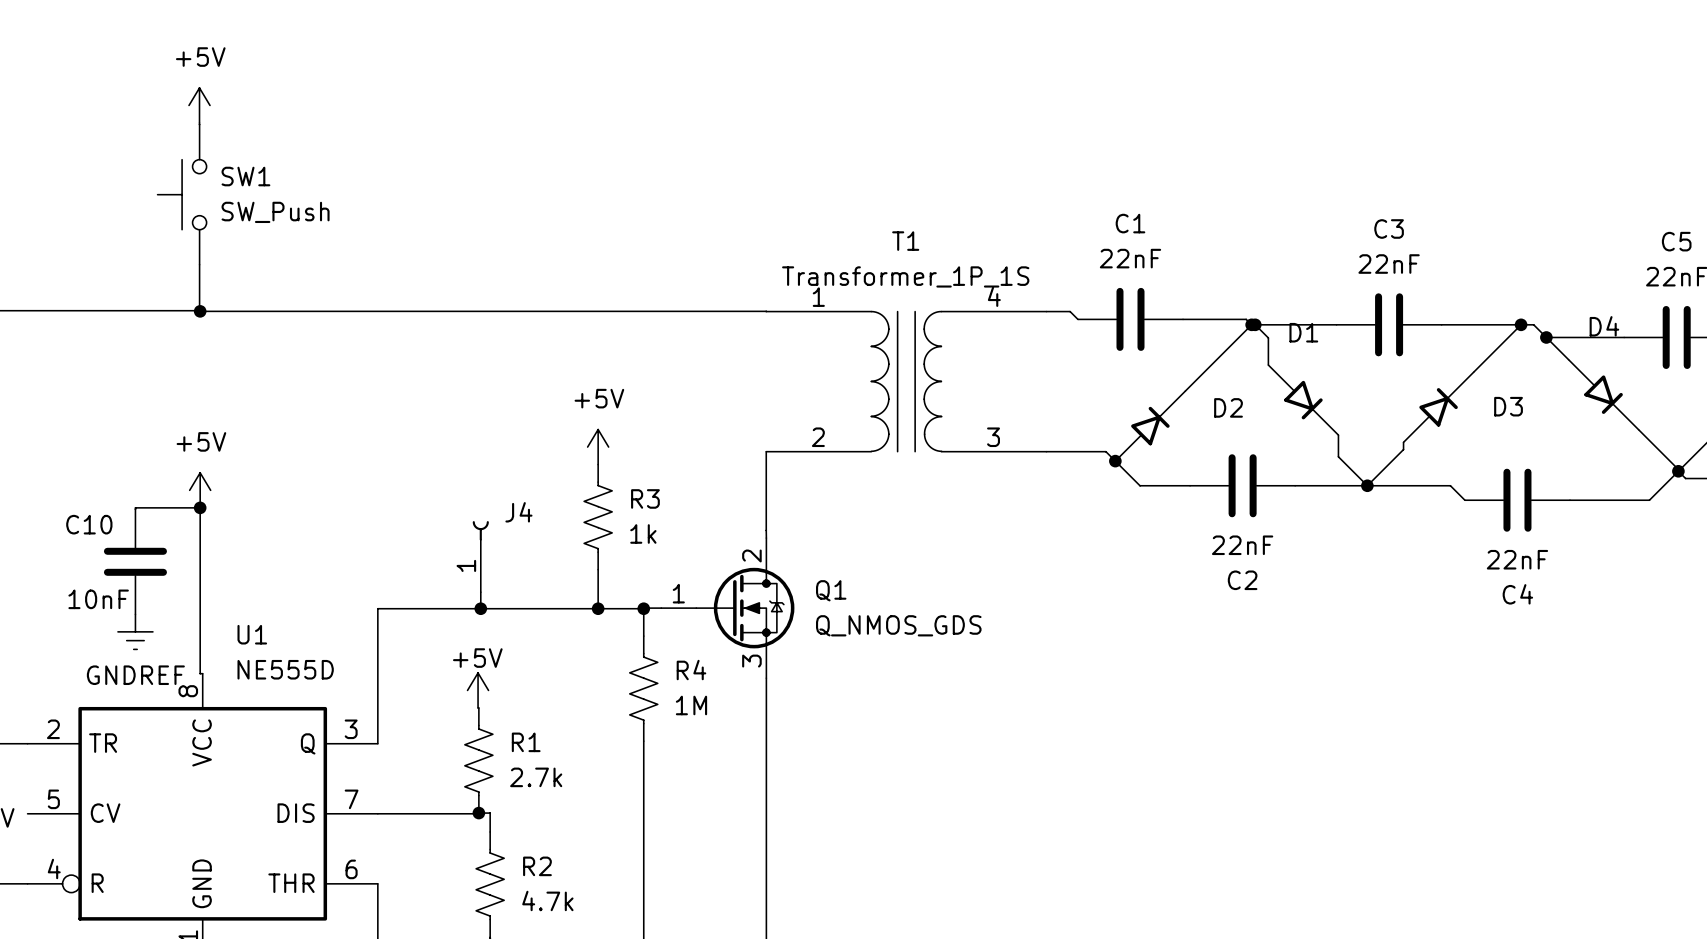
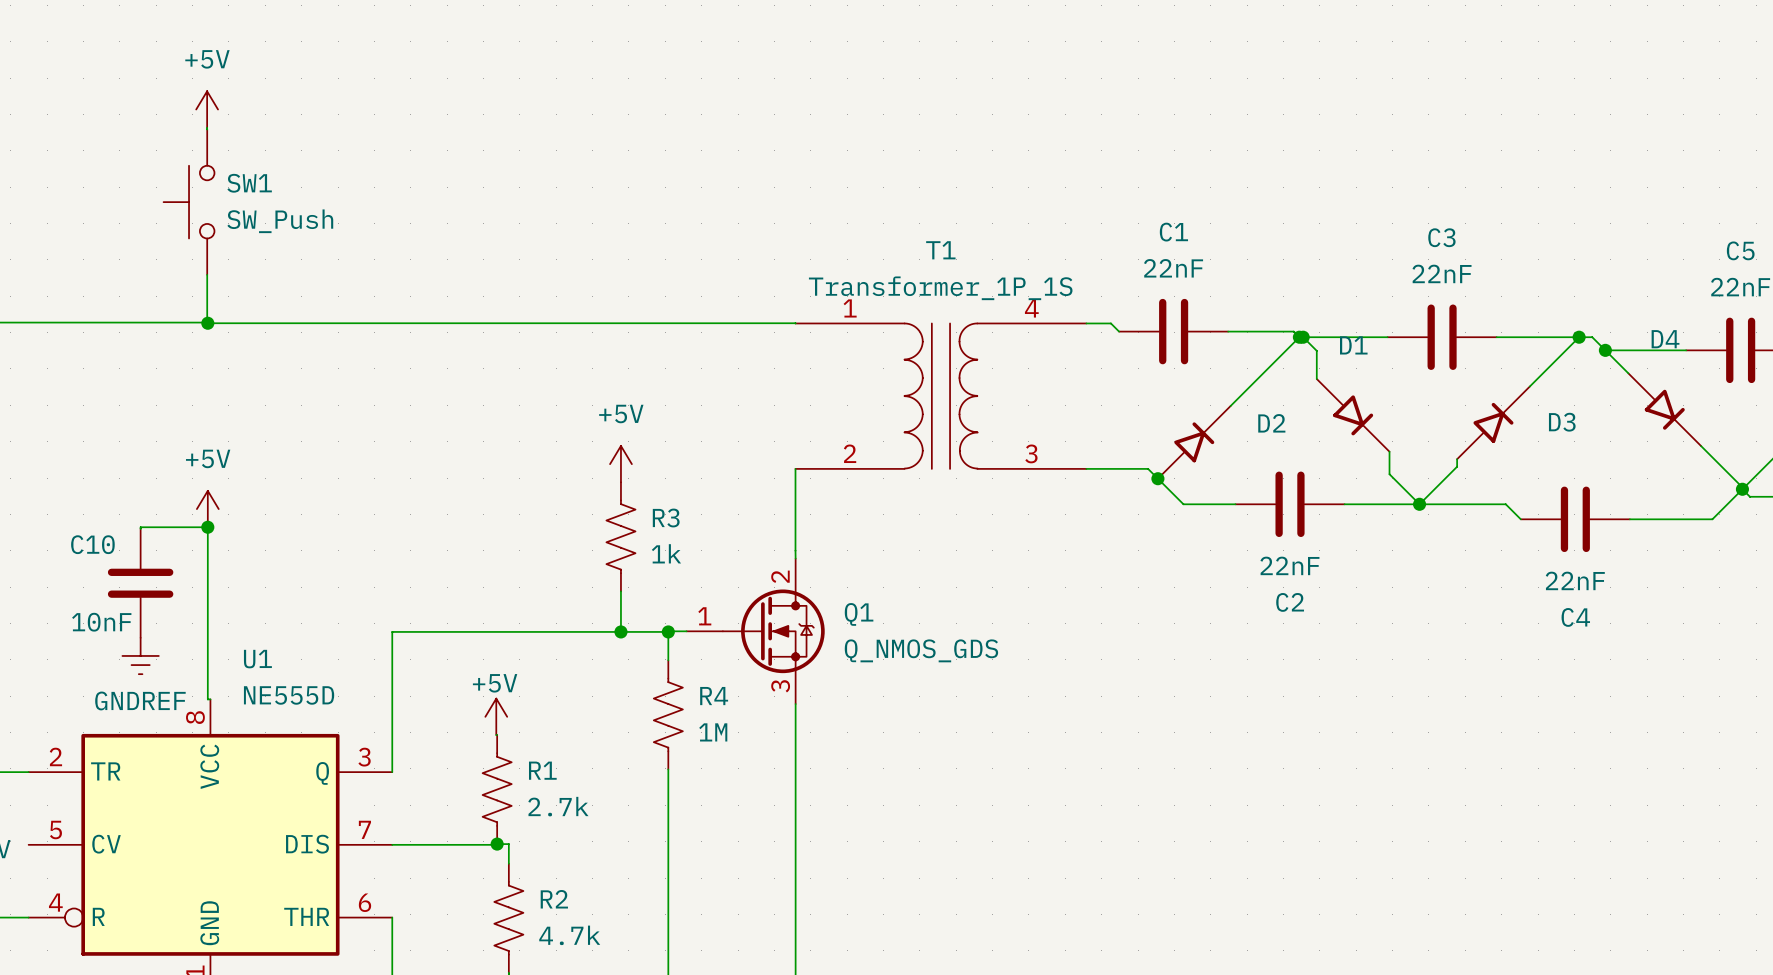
J4: (480, 556) -> none
wire: (480, 592) (480, 608) -> none
junction: (480, 608) -> none

